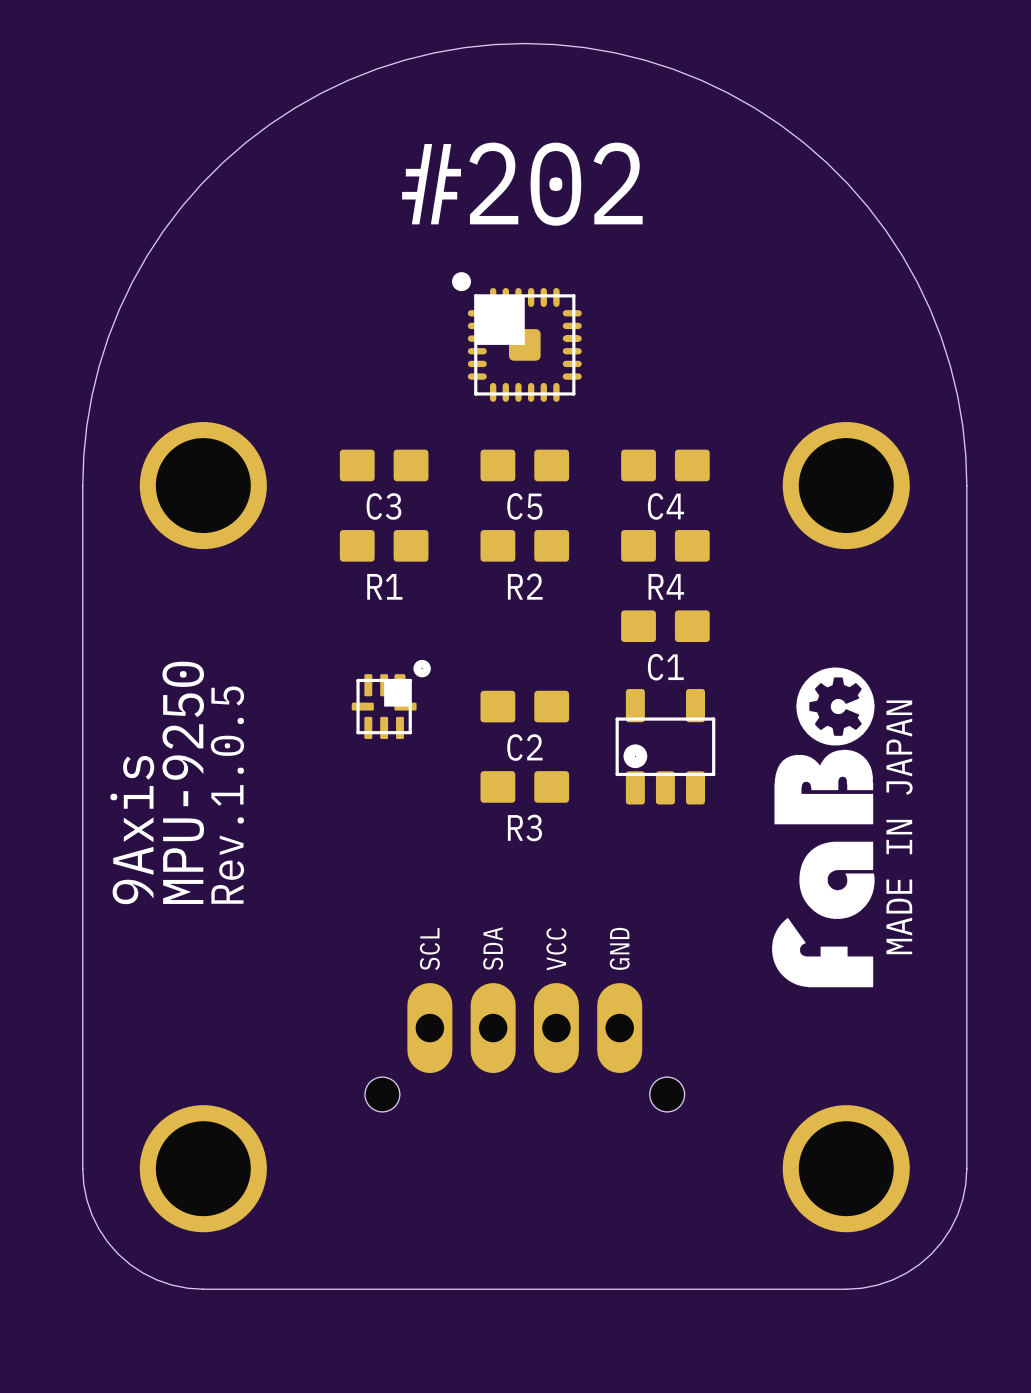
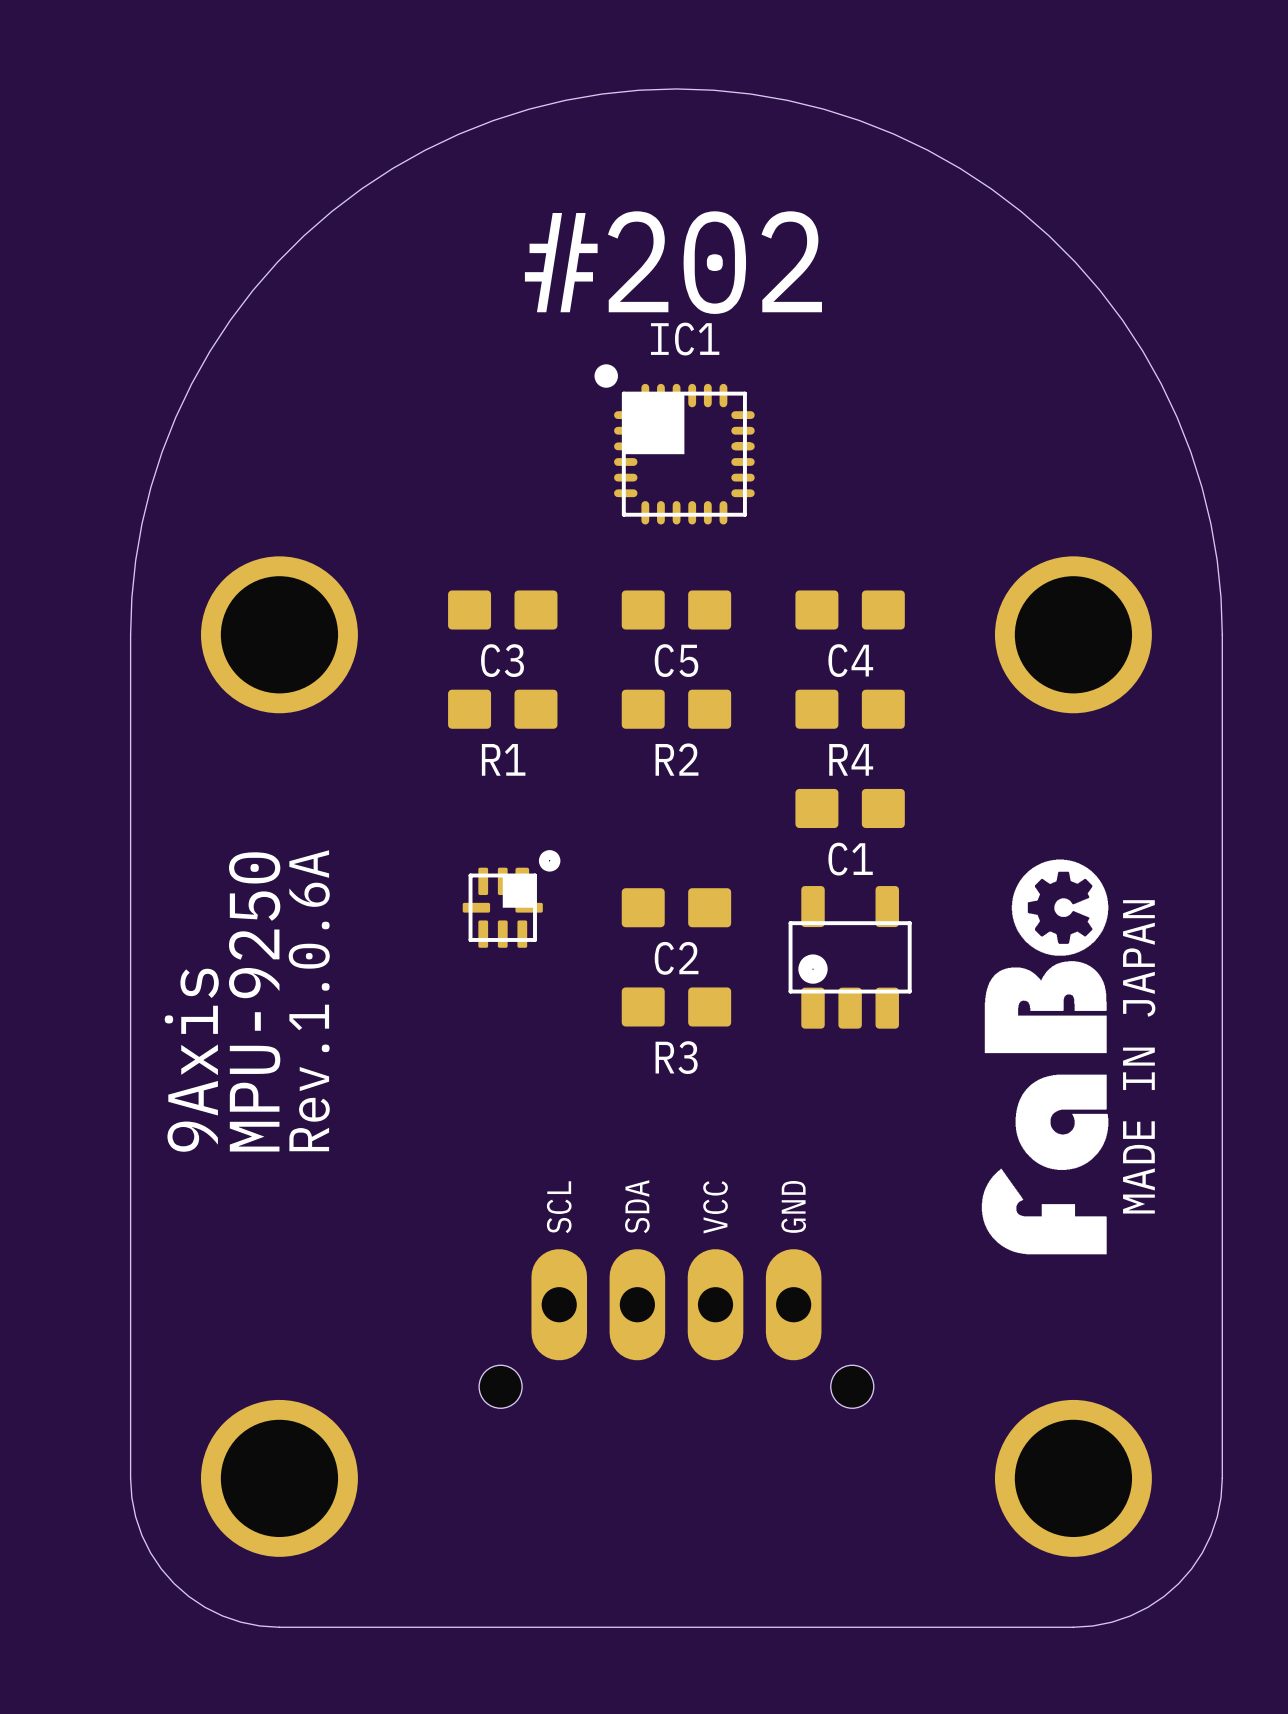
IC1: none -> (674, 444)
part: (516, 337) -> none
text: Rev.1.0.5 (227, 795) -> Rev.1.0.6A (309, 1000)

